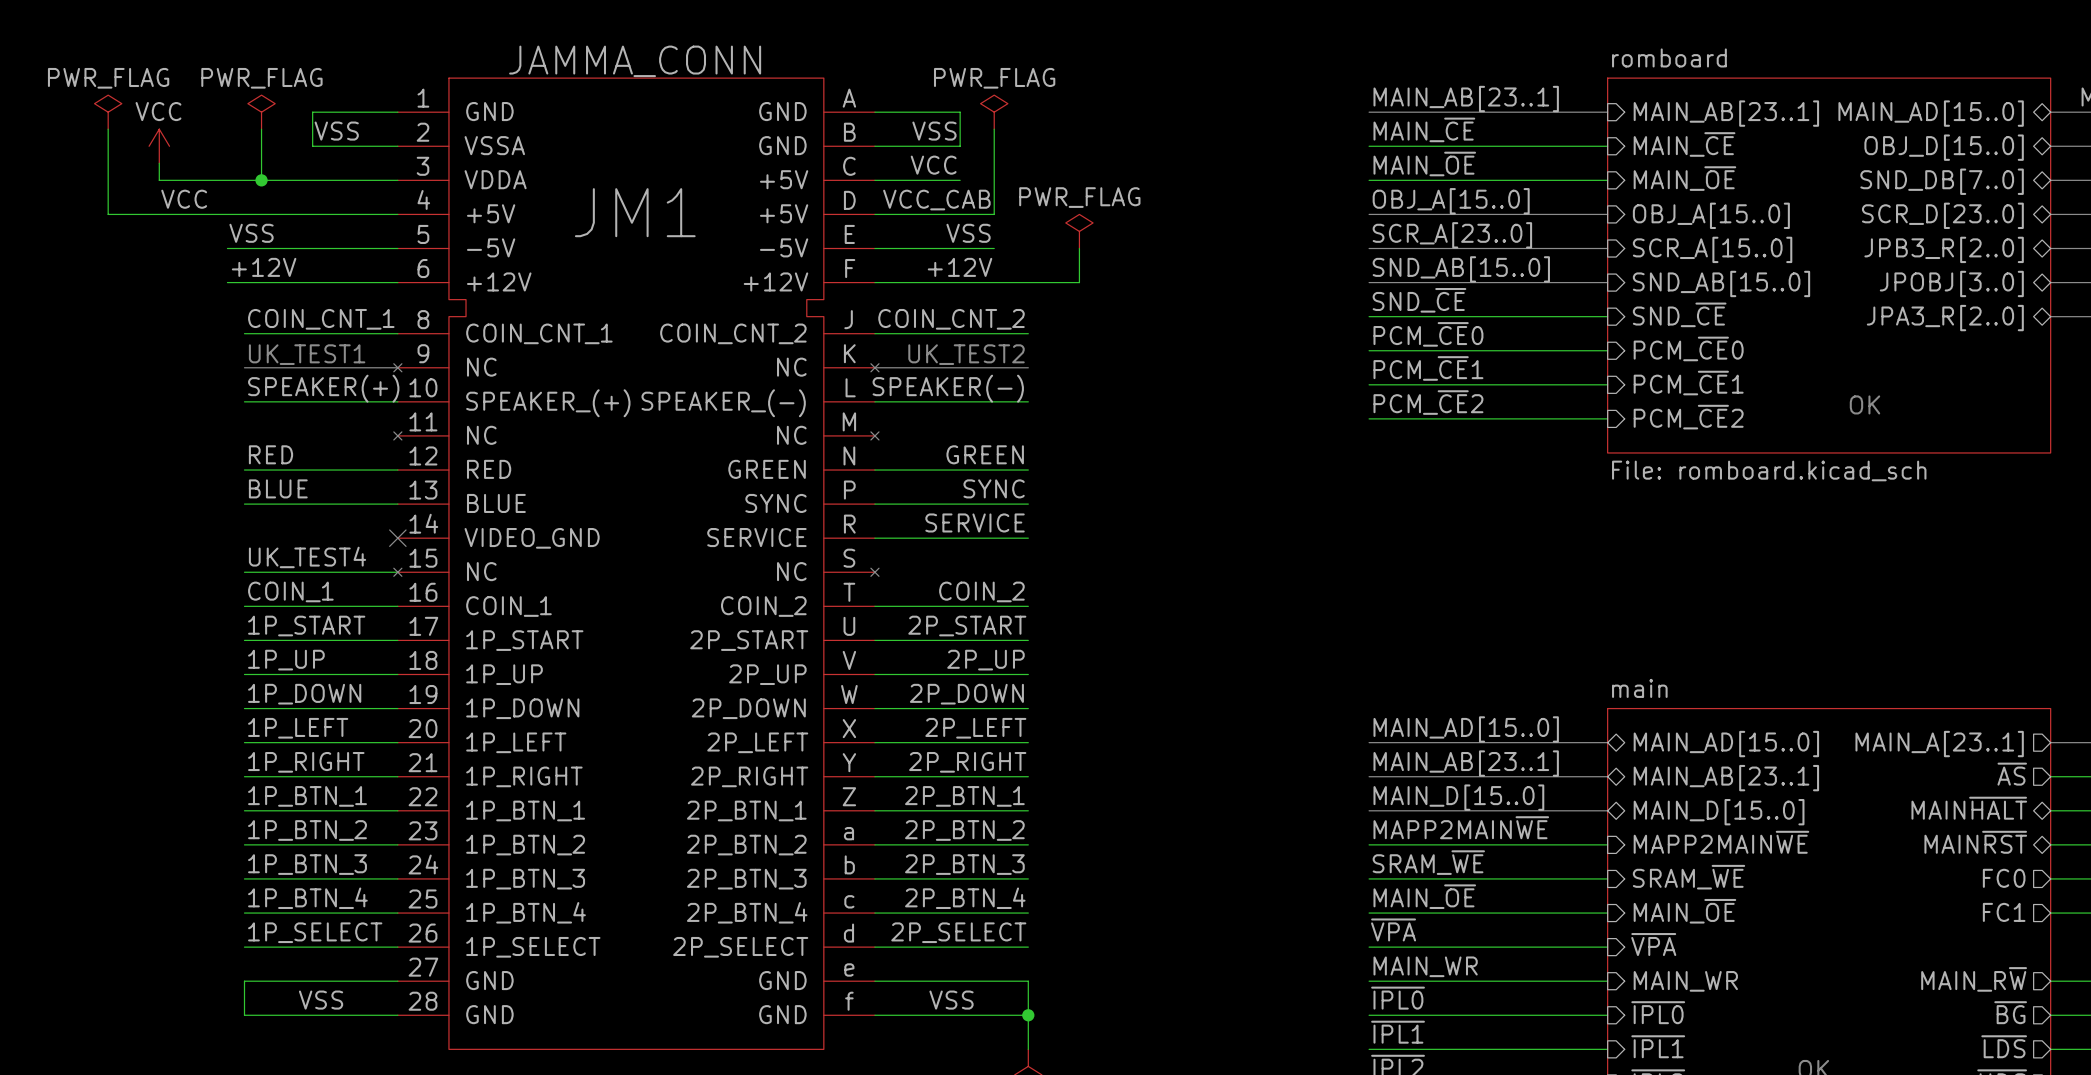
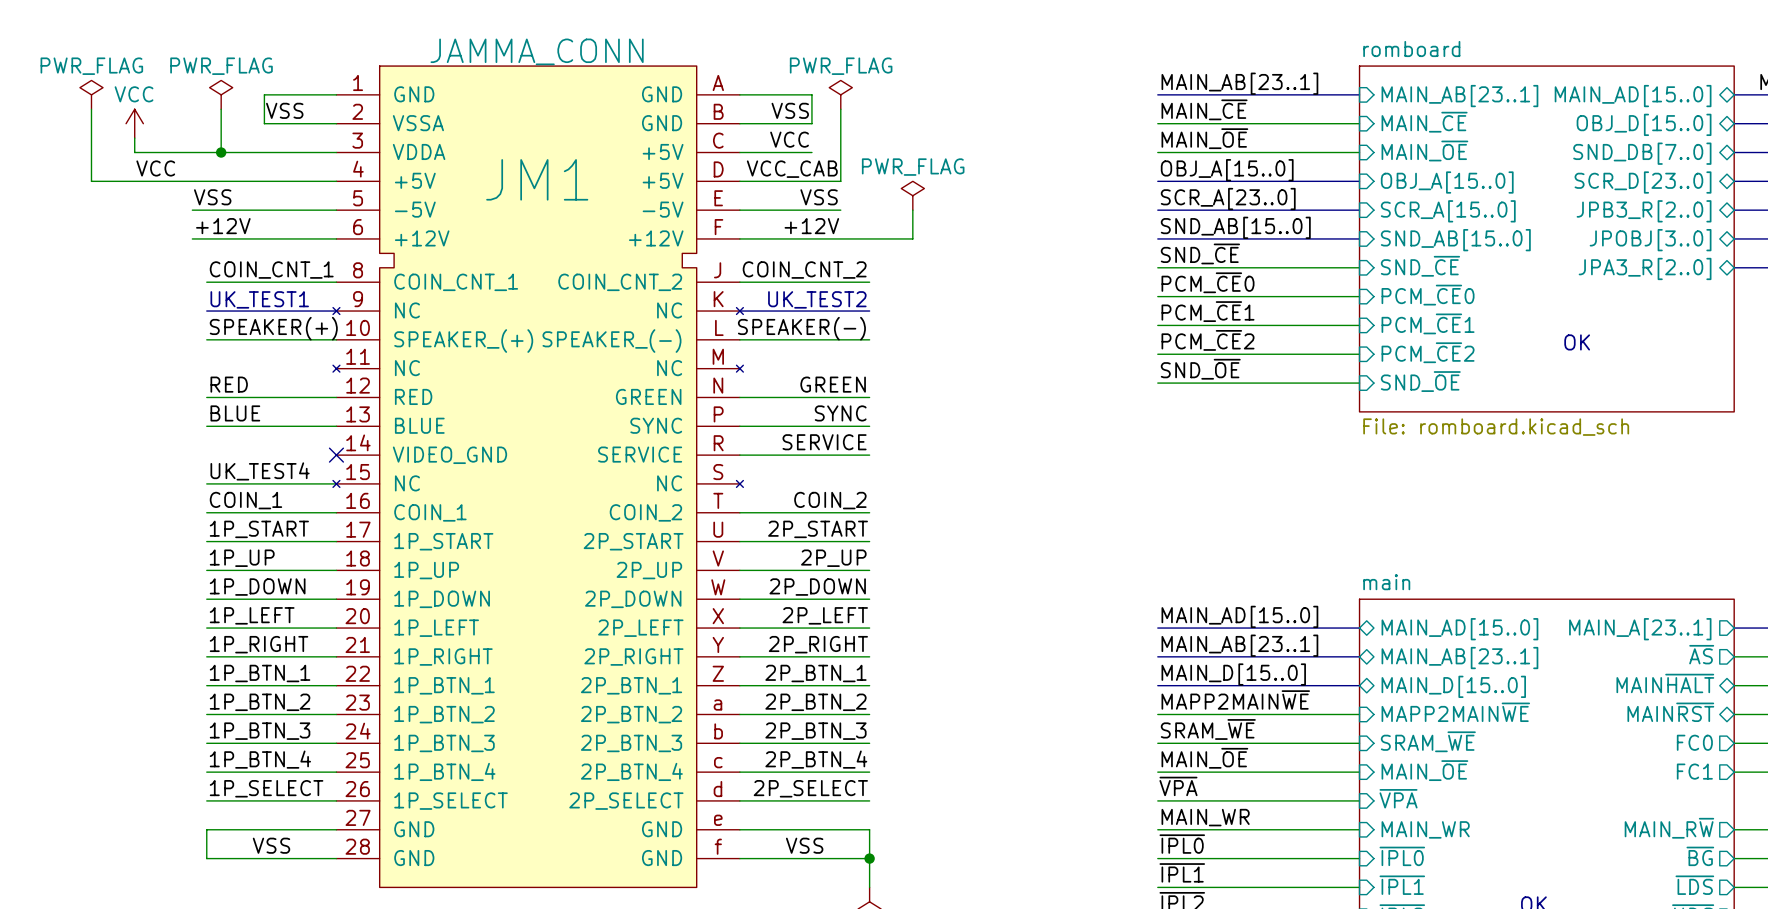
sheet romboard: File: romboard.kicad_sch (1829, 265) -> none
sheet romboard: none -> File: romboard.kicad_sch (1546, 238)
label: none -> SND_~{OE} (1200, 369)
sheet pin: none -> SND_~{OE} (1420, 381)
wire: none -> (1157, 383) (1359, 383)

